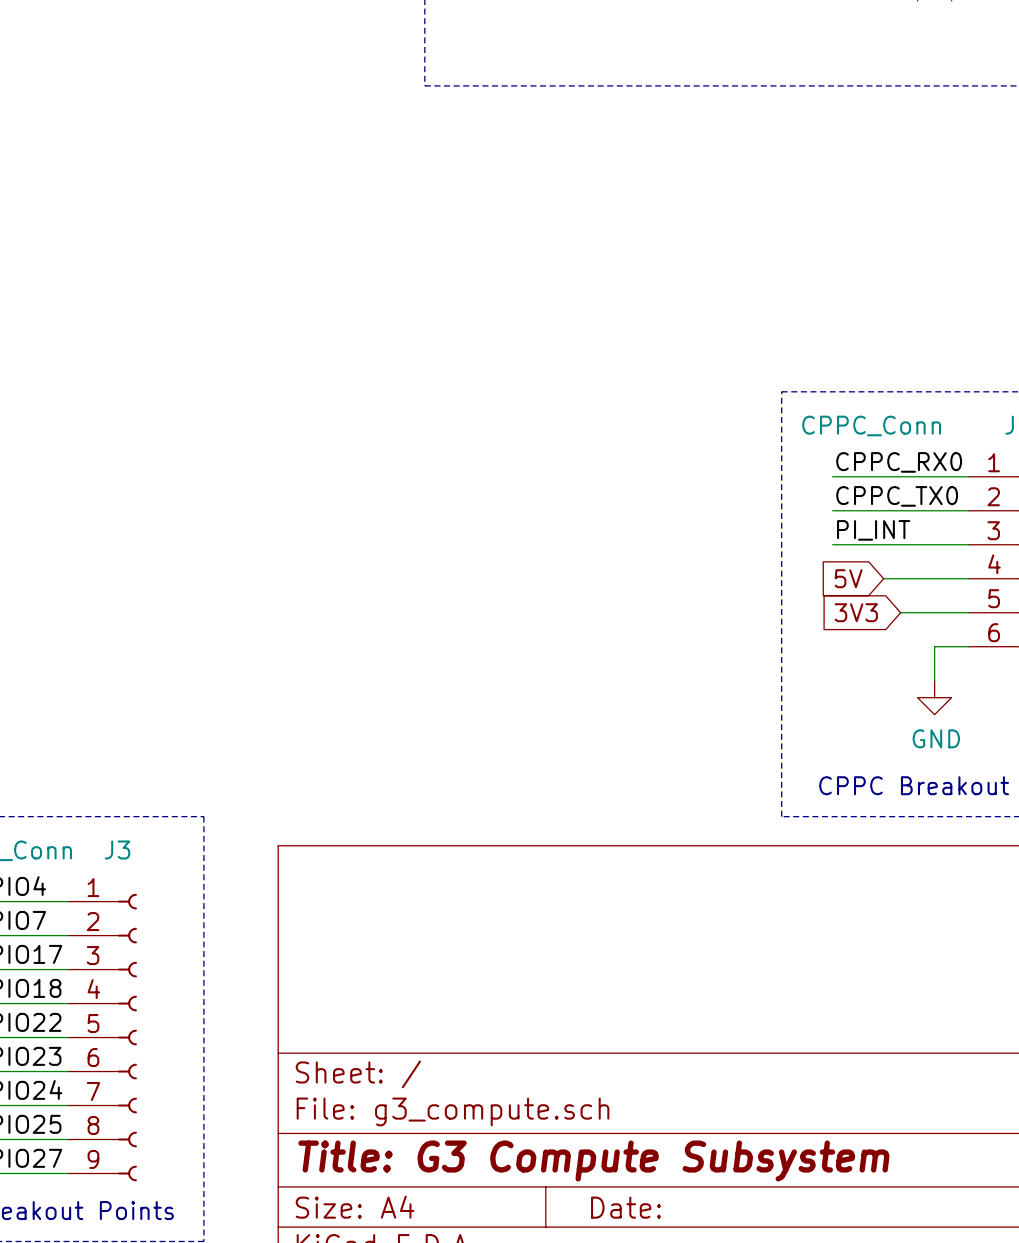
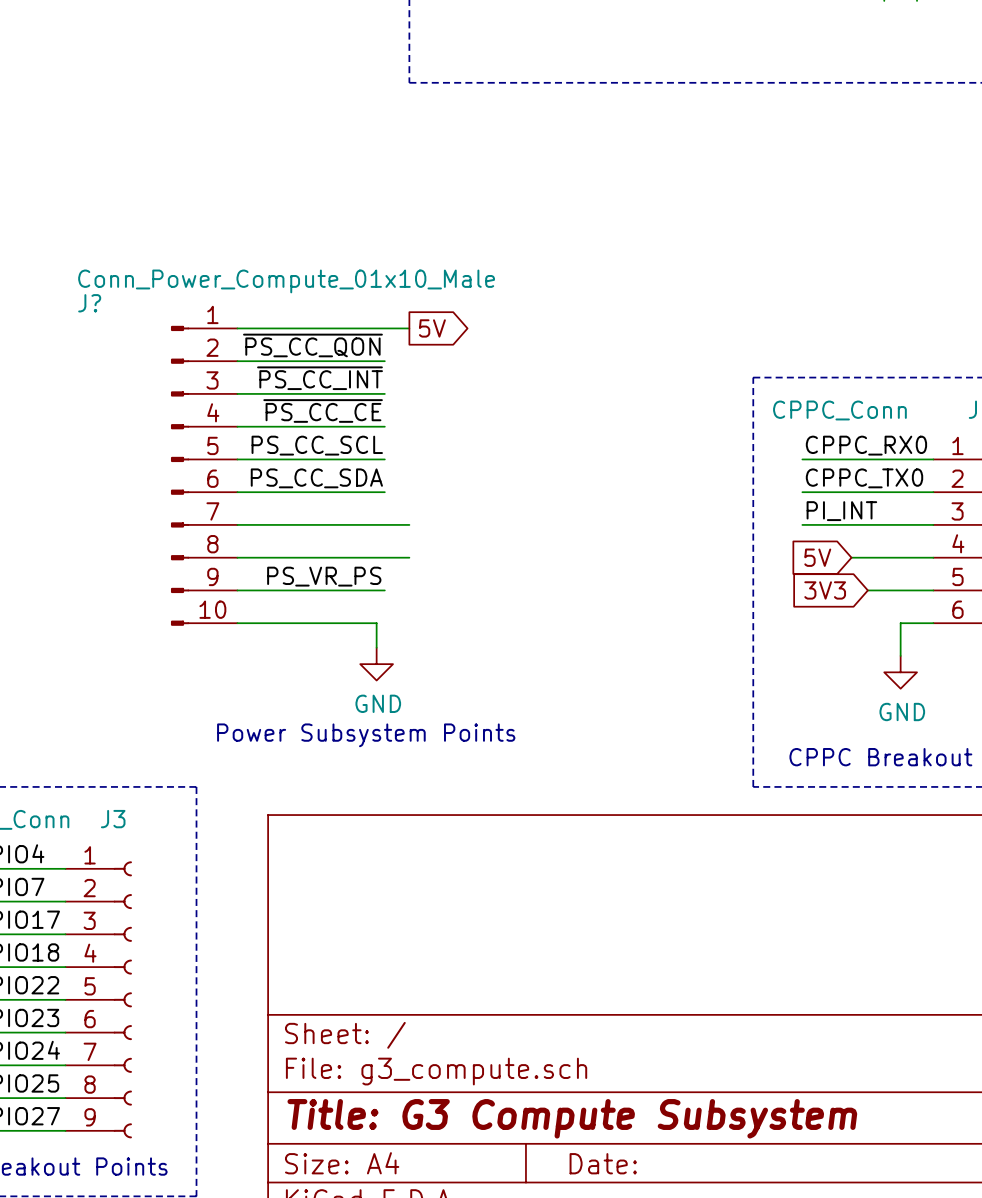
wire: none -> (237, 328) (409, 328)
global label: none -> 5V (432, 328)
label: none -> ~{PS_CC_QON} (312, 345)
wire: none -> (237, 361) (384, 361)
label: none -> ~{PS_CC_INT} (320, 378)
wire: none -> (237, 393) (384, 393)
label: none -> ~{PS_CC_CE} (323, 410)
wire: none -> (237, 426) (384, 426)
label: none -> PS_CC_SCL (317, 445)
wire: none -> (237, 459) (384, 459)
J?: none -> Conn_Power_Compute_01x10_Male (204, 475)
label: none -> PS_CC_SDA (316, 478)
wire: none -> (237, 492) (384, 492)
wire: none -> (237, 524) (409, 524)
wire: none -> (237, 557) (409, 557)
label: none -> PS_VR_PS (324, 576)
wire: none -> (237, 590) (384, 590)
wire: none -> (237, 623) (376, 623) (376, 647)
power symbol: none -> GND (376, 664)
text: none -> Power Subsystem Points (366, 735)

